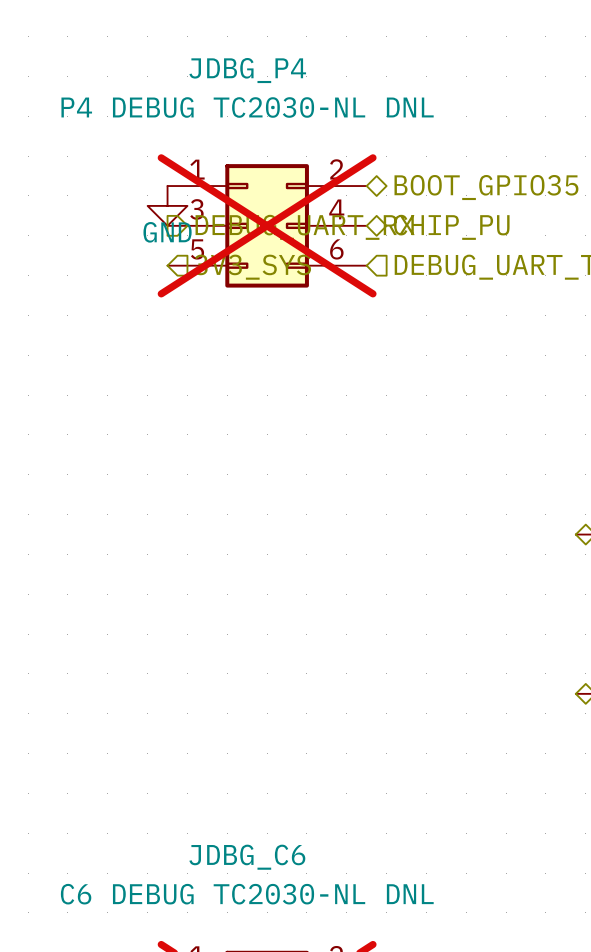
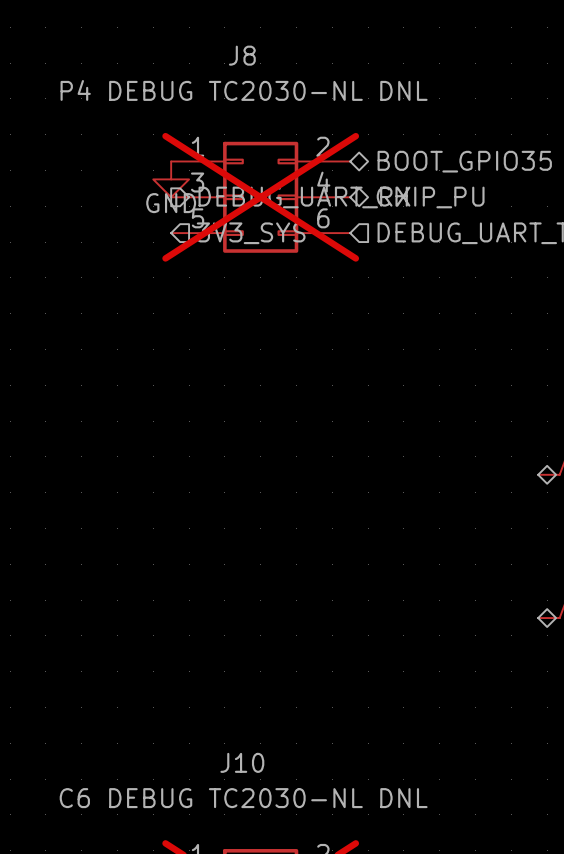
JDBG_P4 name: JDBG_P4 (247, 70) -> J8 (242, 55)
JDBG_C6 name: JDBG_C6 (247, 857) -> J10 (242, 762)

